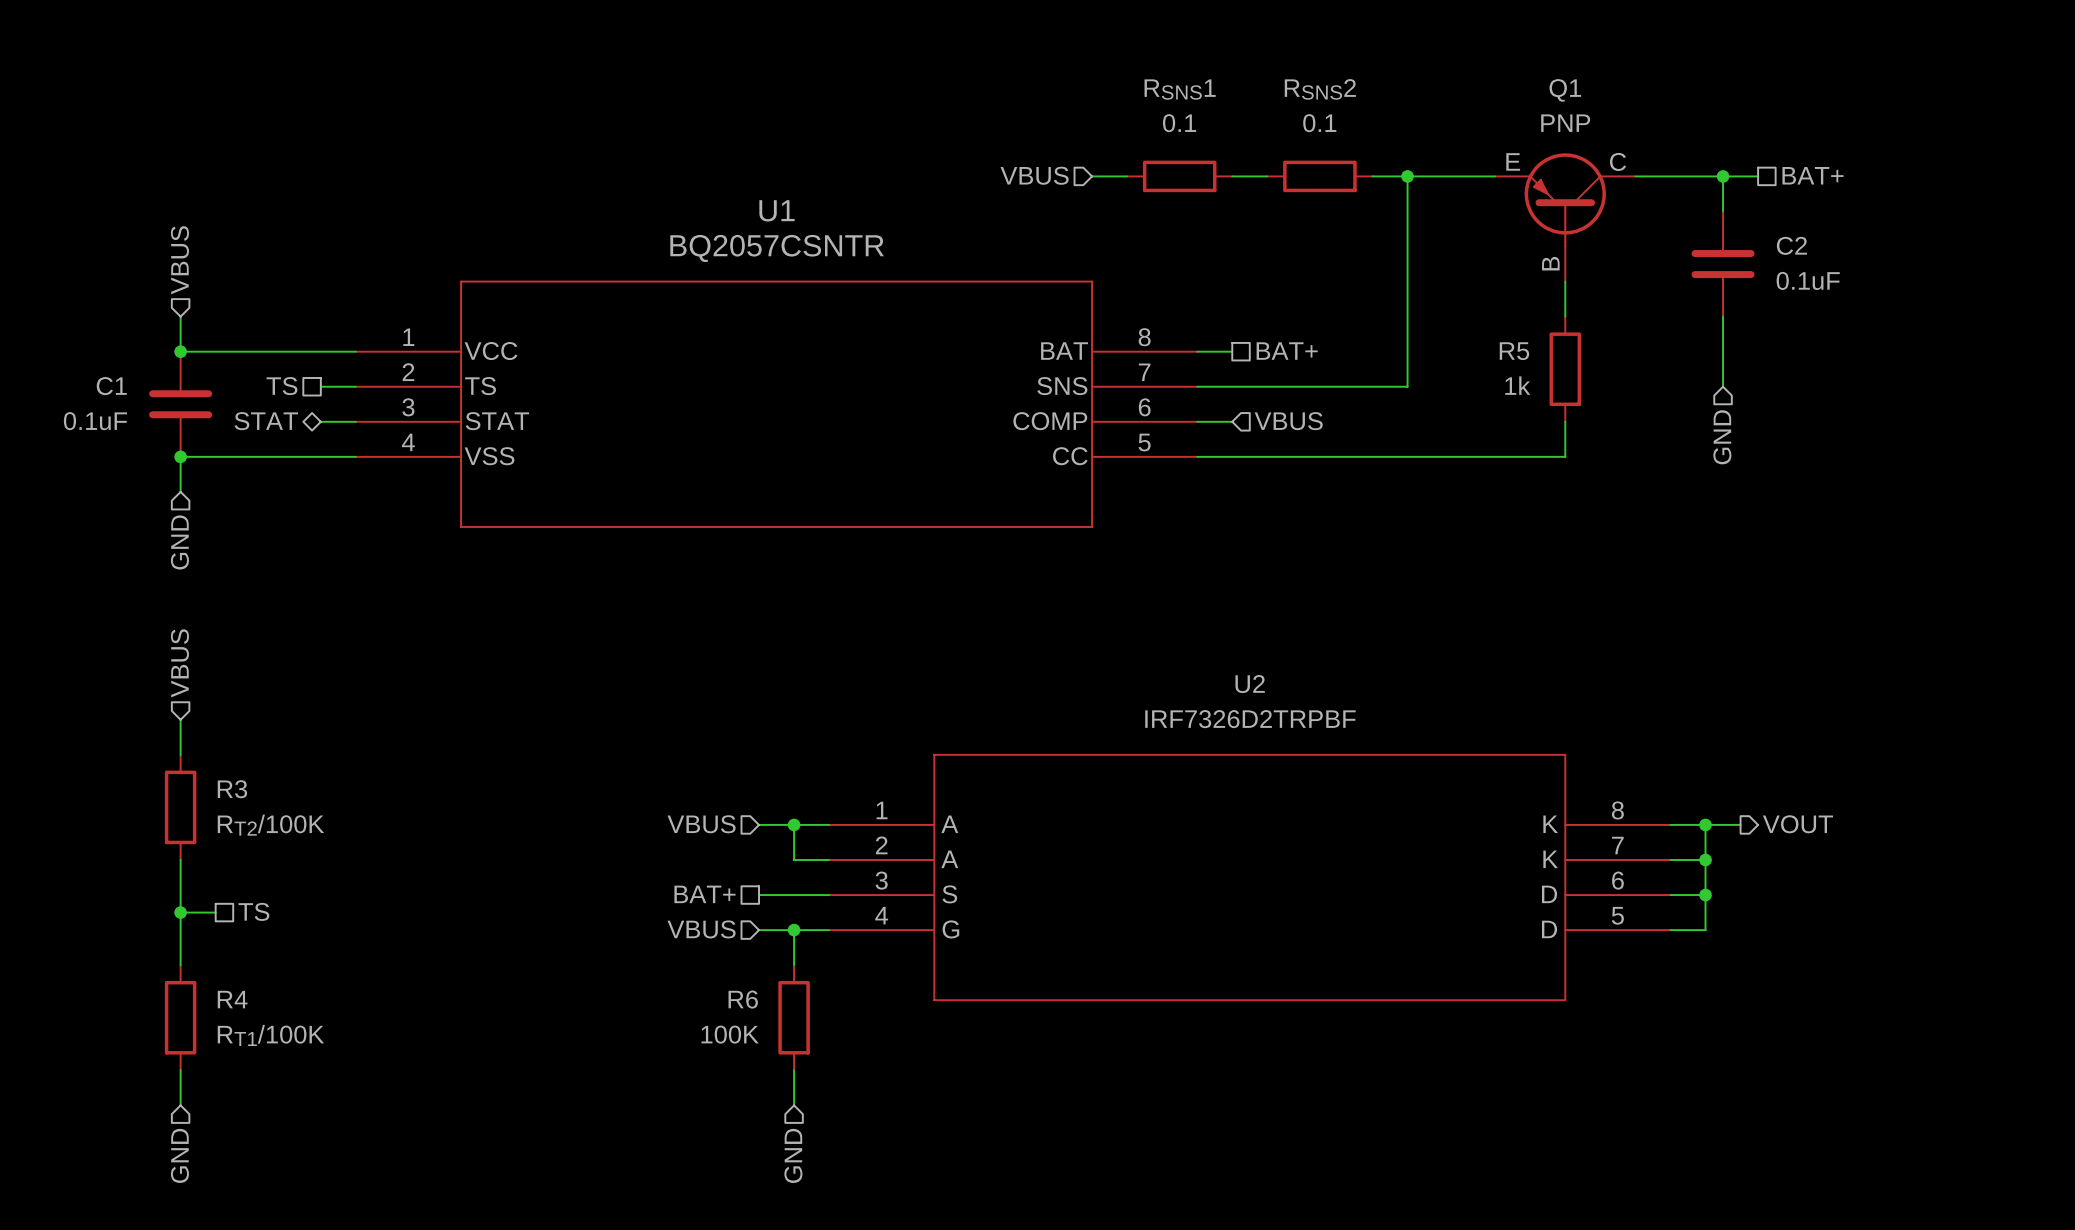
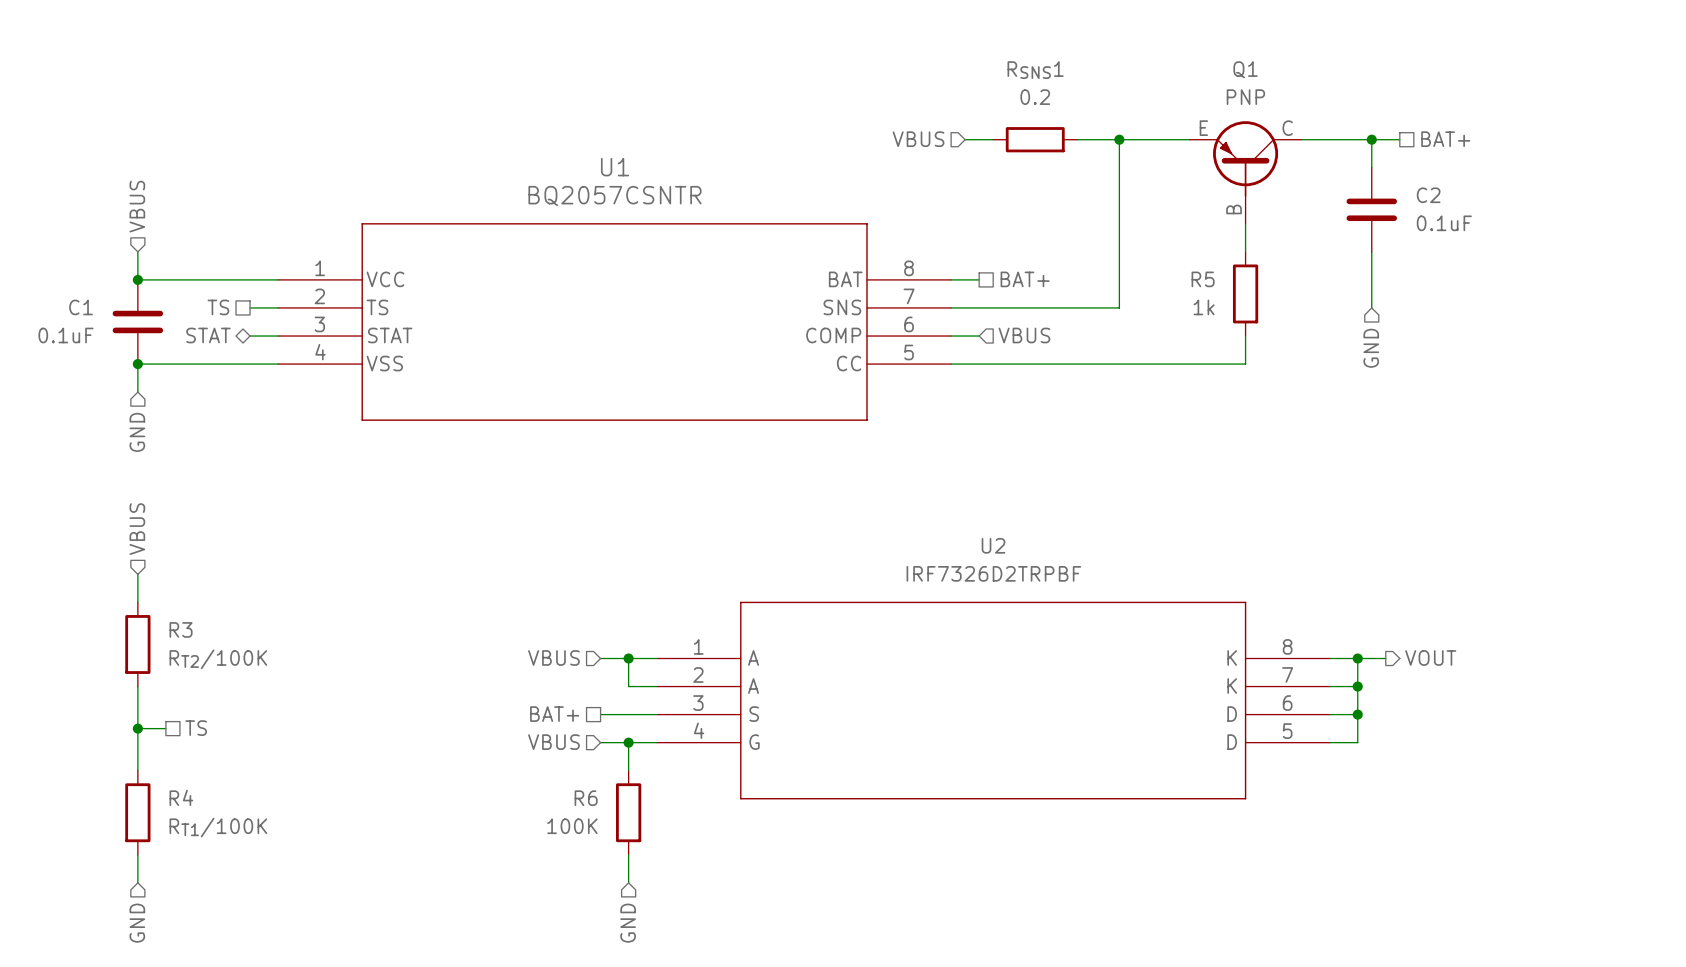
RSNS1 value: 0.1 (1179, 123) -> 0.2 (1035, 97)
hierarchical label position: VBUS (1034, 175) -> VBUS (918, 139)
wire: (1092, 176) (1127, 176) -> none
RSNS1 position: (1179, 176) -> (1035, 139)
RSNS2: 0.1 (1319, 176) -> none

